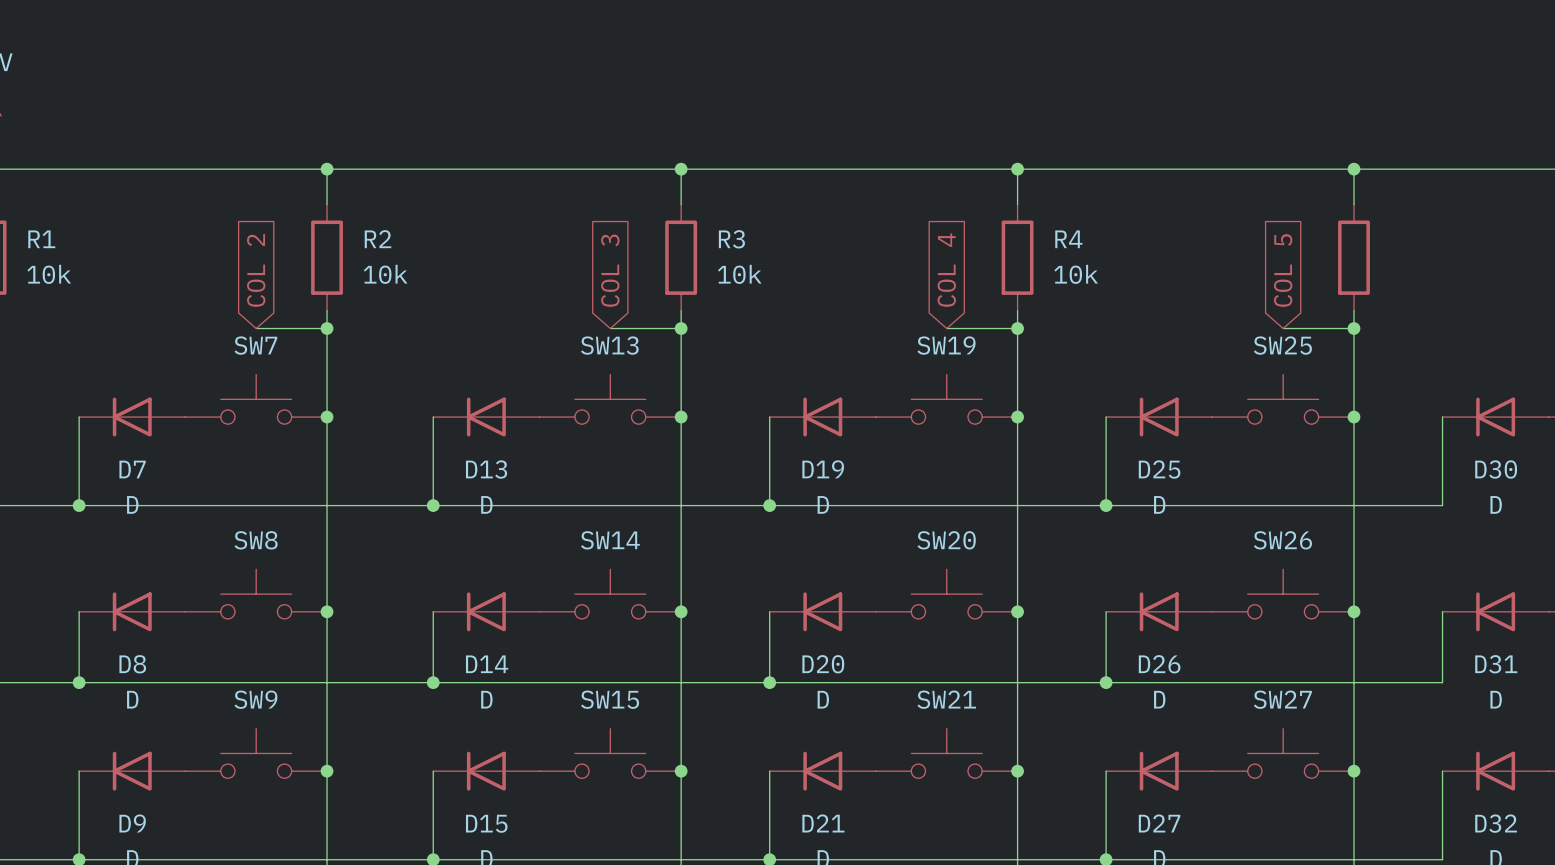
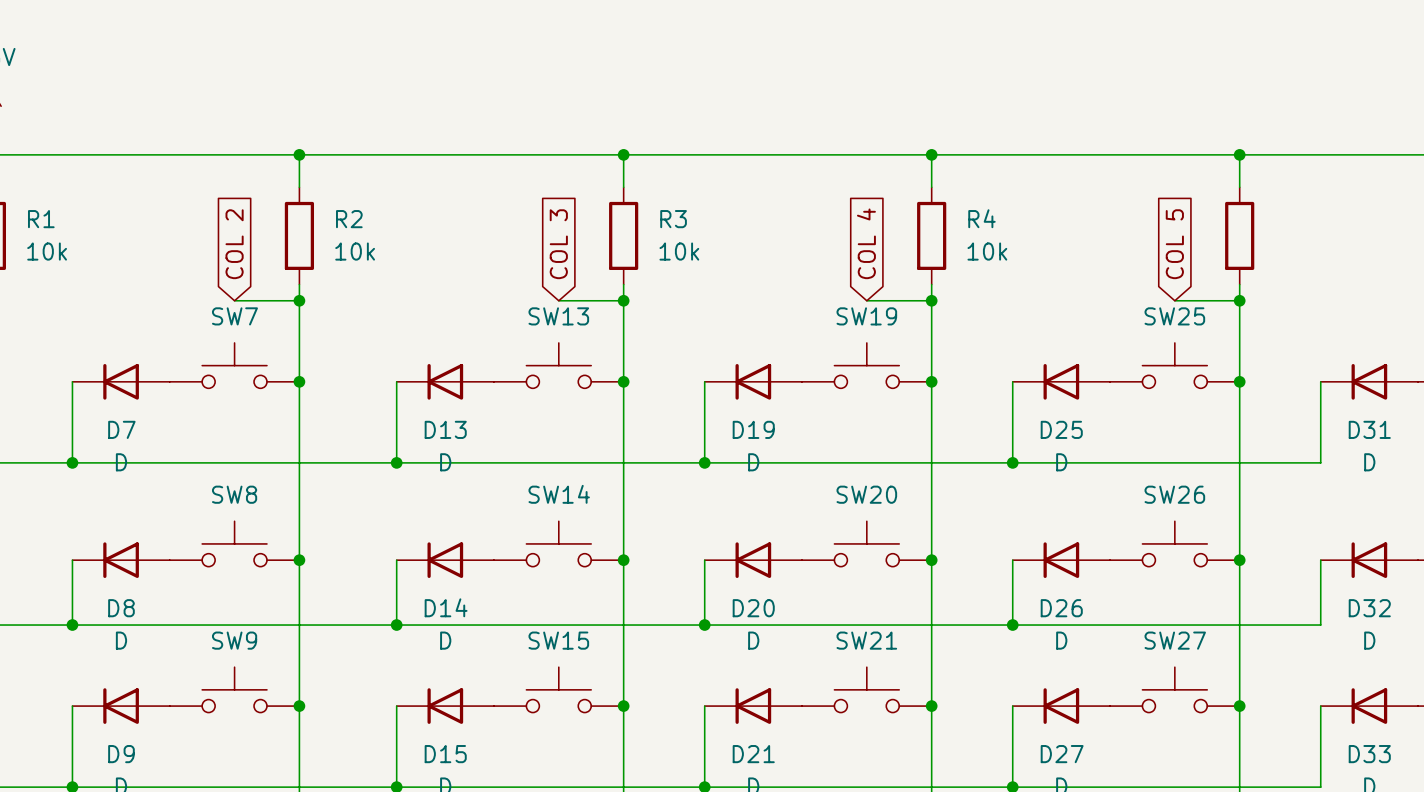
D30 name: D30 (1496, 469) -> D31 (1369, 429)
D31 name: D31 (1496, 664) -> D32 (1369, 608)
D32 name: D32 (1496, 823) -> D33 (1369, 754)

